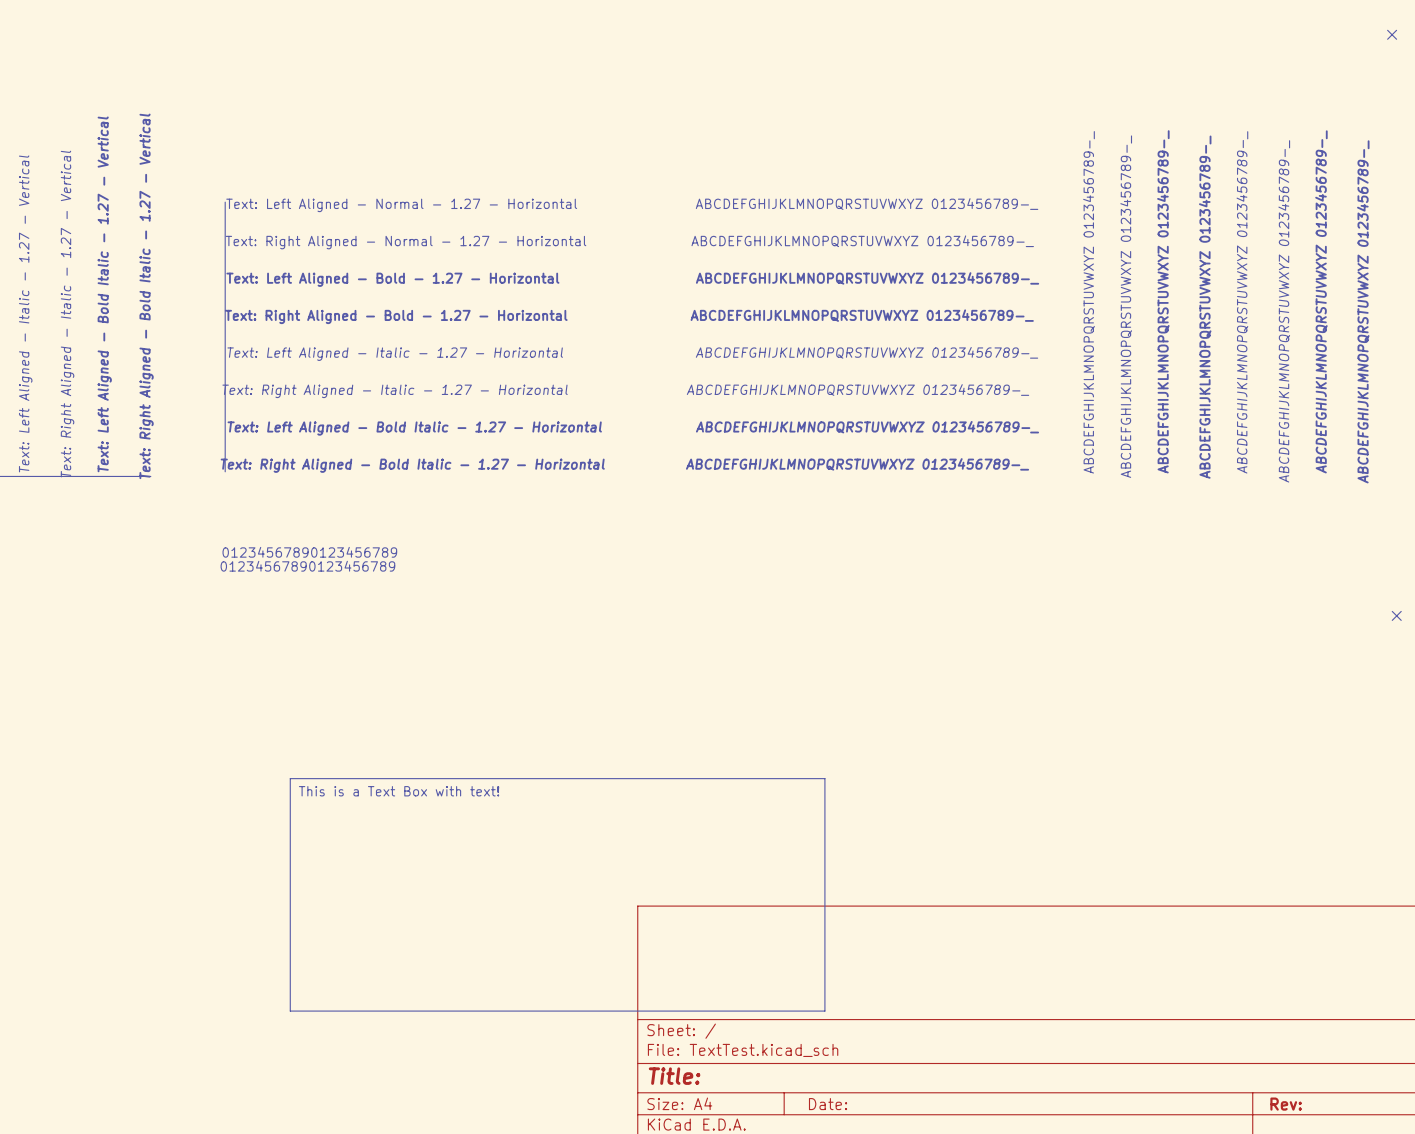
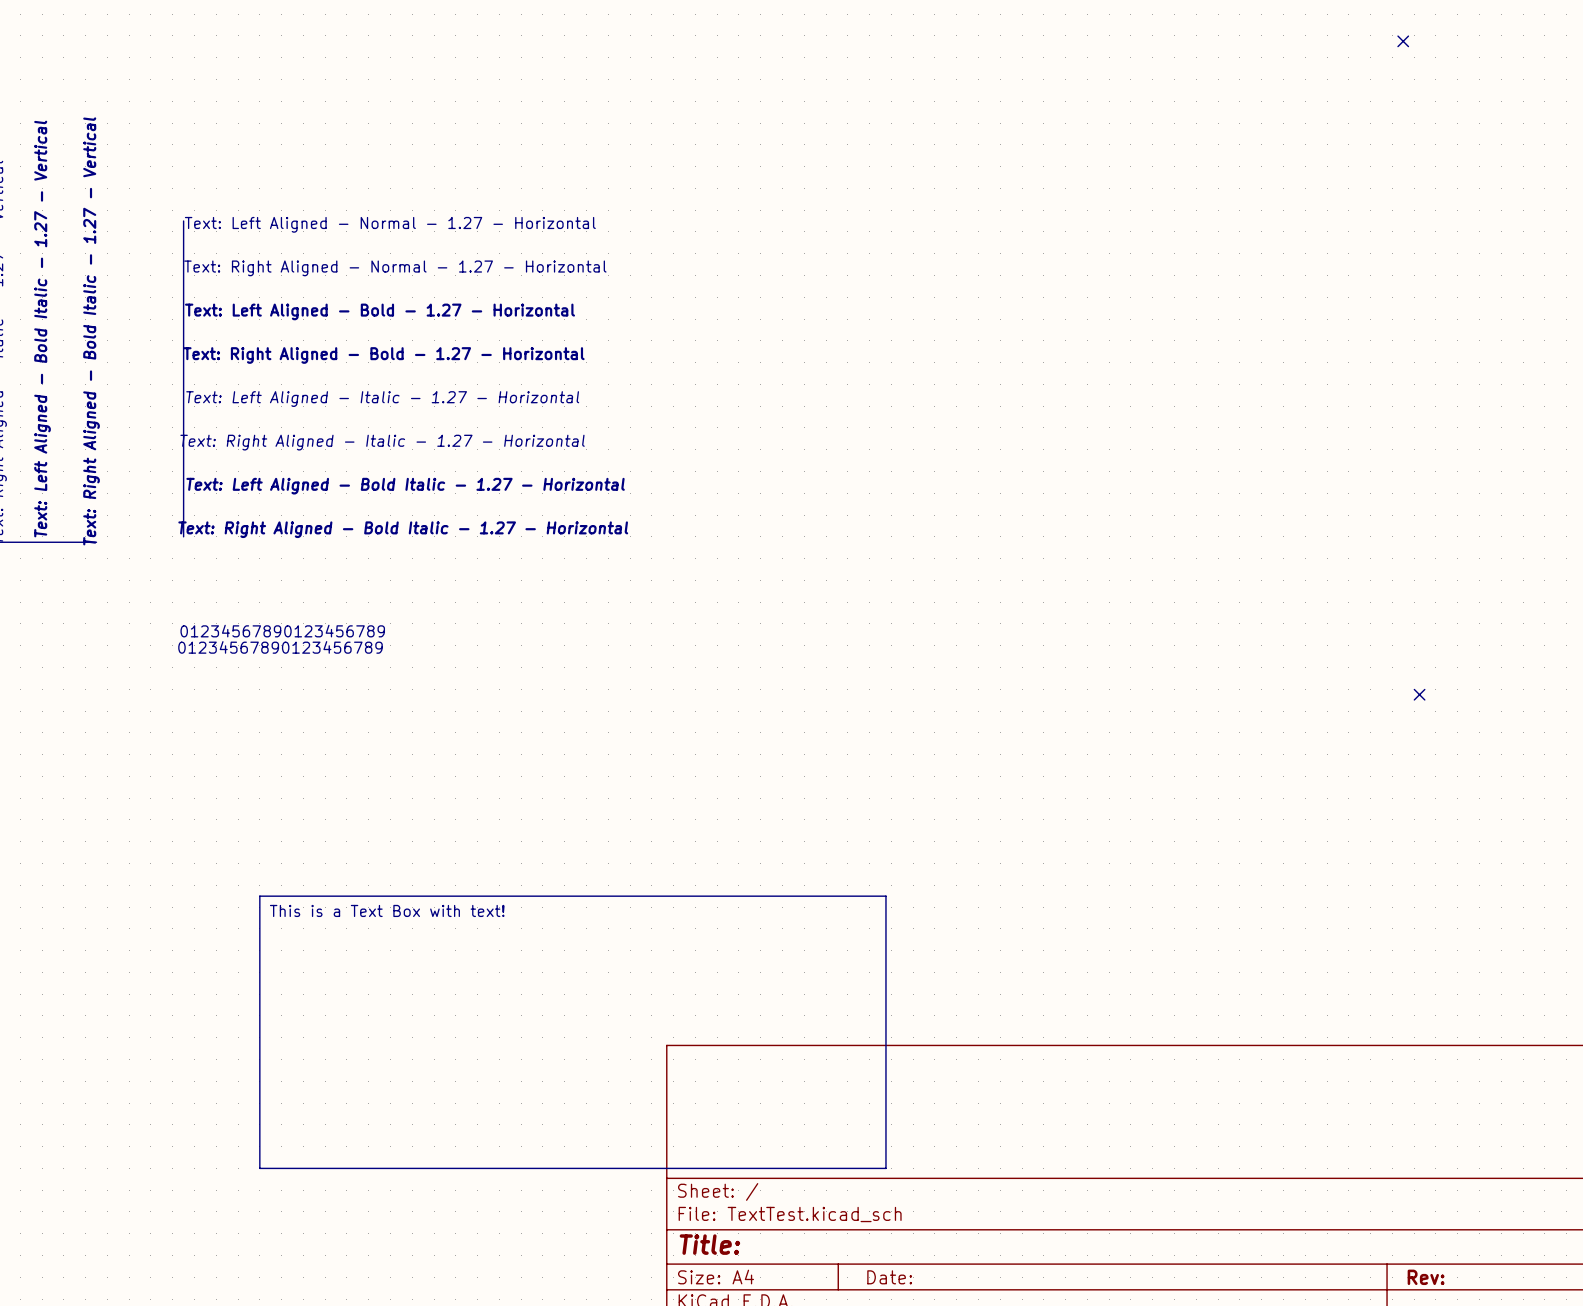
no-connect mark: (1392, 34) -> none
no-connect mark: none -> (1403, 41)
text: ABCDEFGHIJKLMNOPQRSTUVWXYZ 0123456789-_ (867, 204) -> none
text: ABCDEFGHIJKLMNOPQRSTUVWXYZ 0123456789-_ (862, 241) -> none
text: ABCDEFGHIJKLMNOPQRSTUVWXYZ 0123456789-_ (867, 278) -> none
text: ABCDEFGHIJKLMNOPQRSTUVWXYZ 0123456789-_ (1163, 301) -> none
text: ABCDEFGHIJKLMNOPQRSTUVWXYZ 0123456789-_ (1321, 301) -> none
text: ABCDEFGHIJKLMNOPQRSTUVWXYZ 0123456789-_ (1088, 302) -> none
text: ABCDEFGHIJKLMNOPQRSTUVWXYZ 0123456789-_ (1242, 302) -> none
text: ABCDEFGHIJKLMNOPQRSTUVWXYZ 0123456789-_ (1126, 306) -> none
text: ABCDEFGHIJKLMNOPQRSTUVWXYZ 0123456789-_ (1205, 307) -> none
text: ABCDEFGHIJKLMNOPQRSTUVWXYZ 0123456789-_ (1284, 311) -> none
text: ABCDEFGHIJKLMNOPQRSTUVWXYZ 0123456789-_ (1363, 311) -> none
text: ABCDEFGHIJKLMNOPQRSTUVWXYZ 0123456789-_ (862, 315) -> none
text: ABCDEFGHIJKLMNOPQRSTUVWXYZ 0123456789-_ (866, 352) -> none
text: ABCDEFGHIJKLMNOPQRSTUVWXYZ 0123456789-_ (858, 390) -> none
text: ABCDEFGHIJKLMNOPQRSTUVWXYZ 0123456789-_ (867, 427) -> none
text: ABCDEFGHIJKLMNOPQRSTUVWXYZ 0123456789-_ (857, 464) -> none
no-connect mark: none -> (1419, 694)
no-connect mark: (1396, 615) -> none

